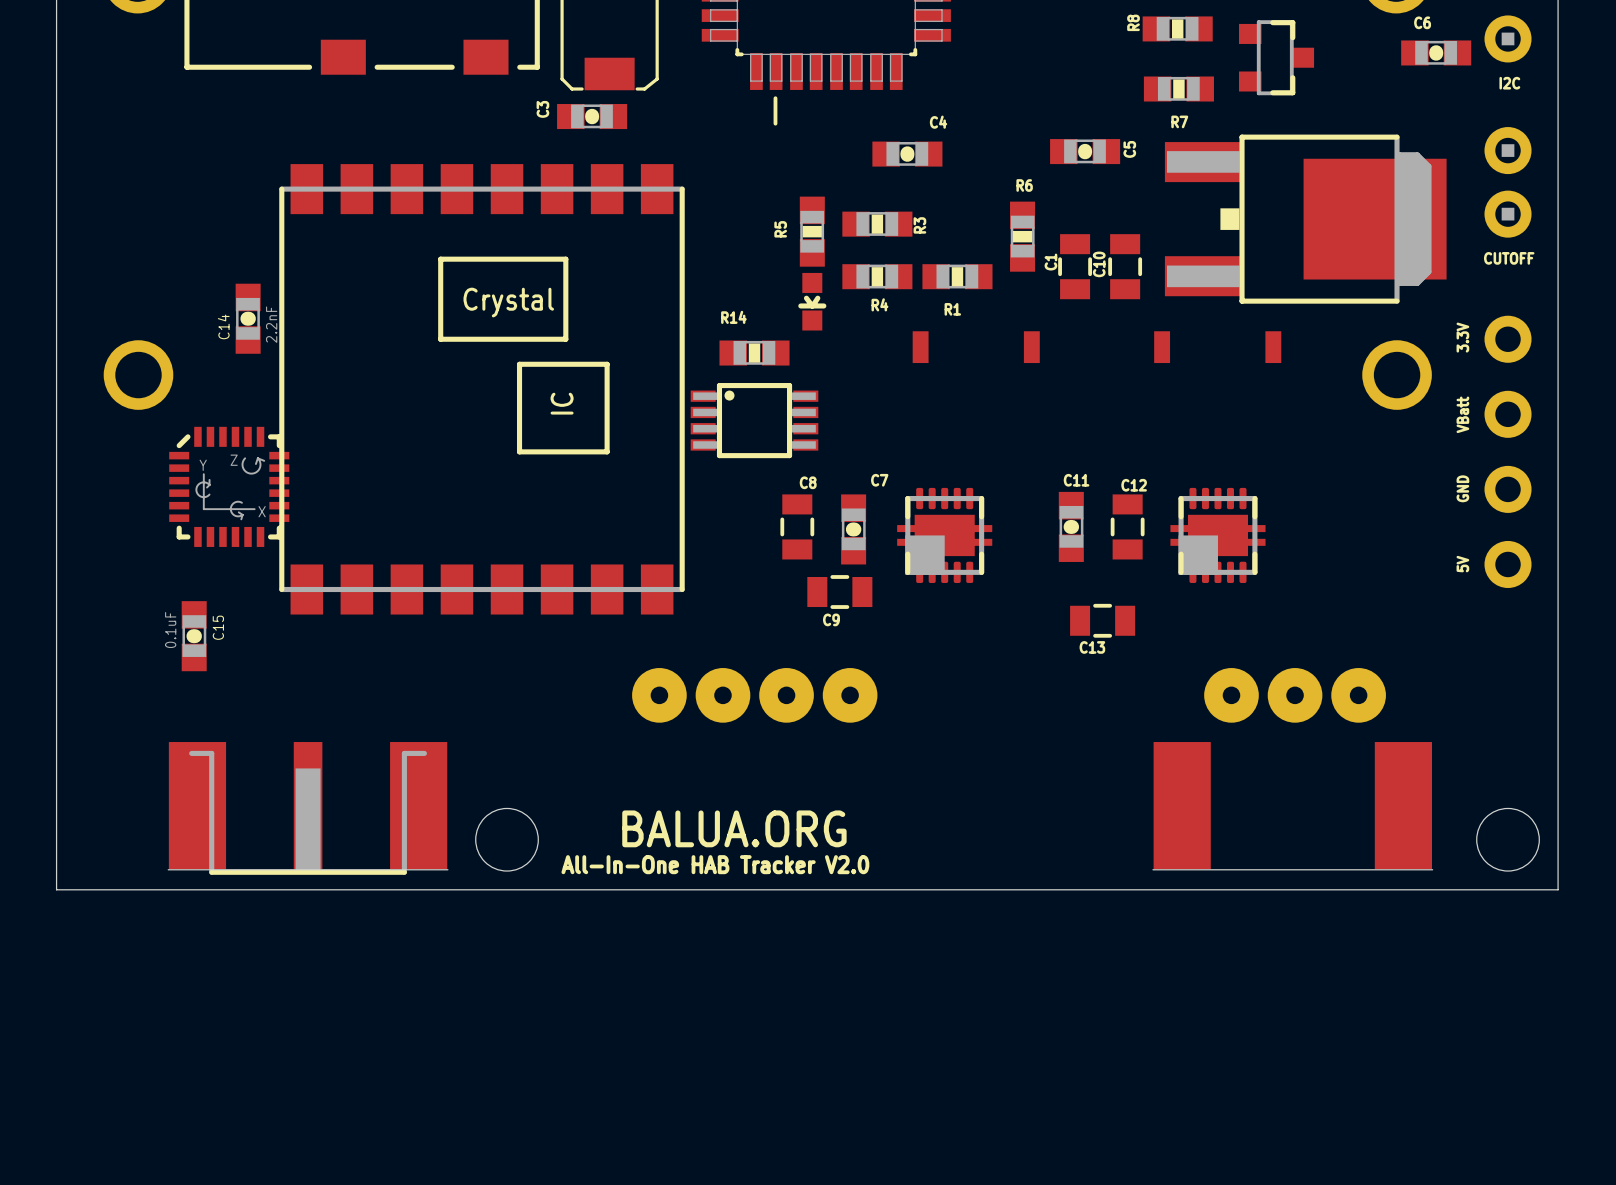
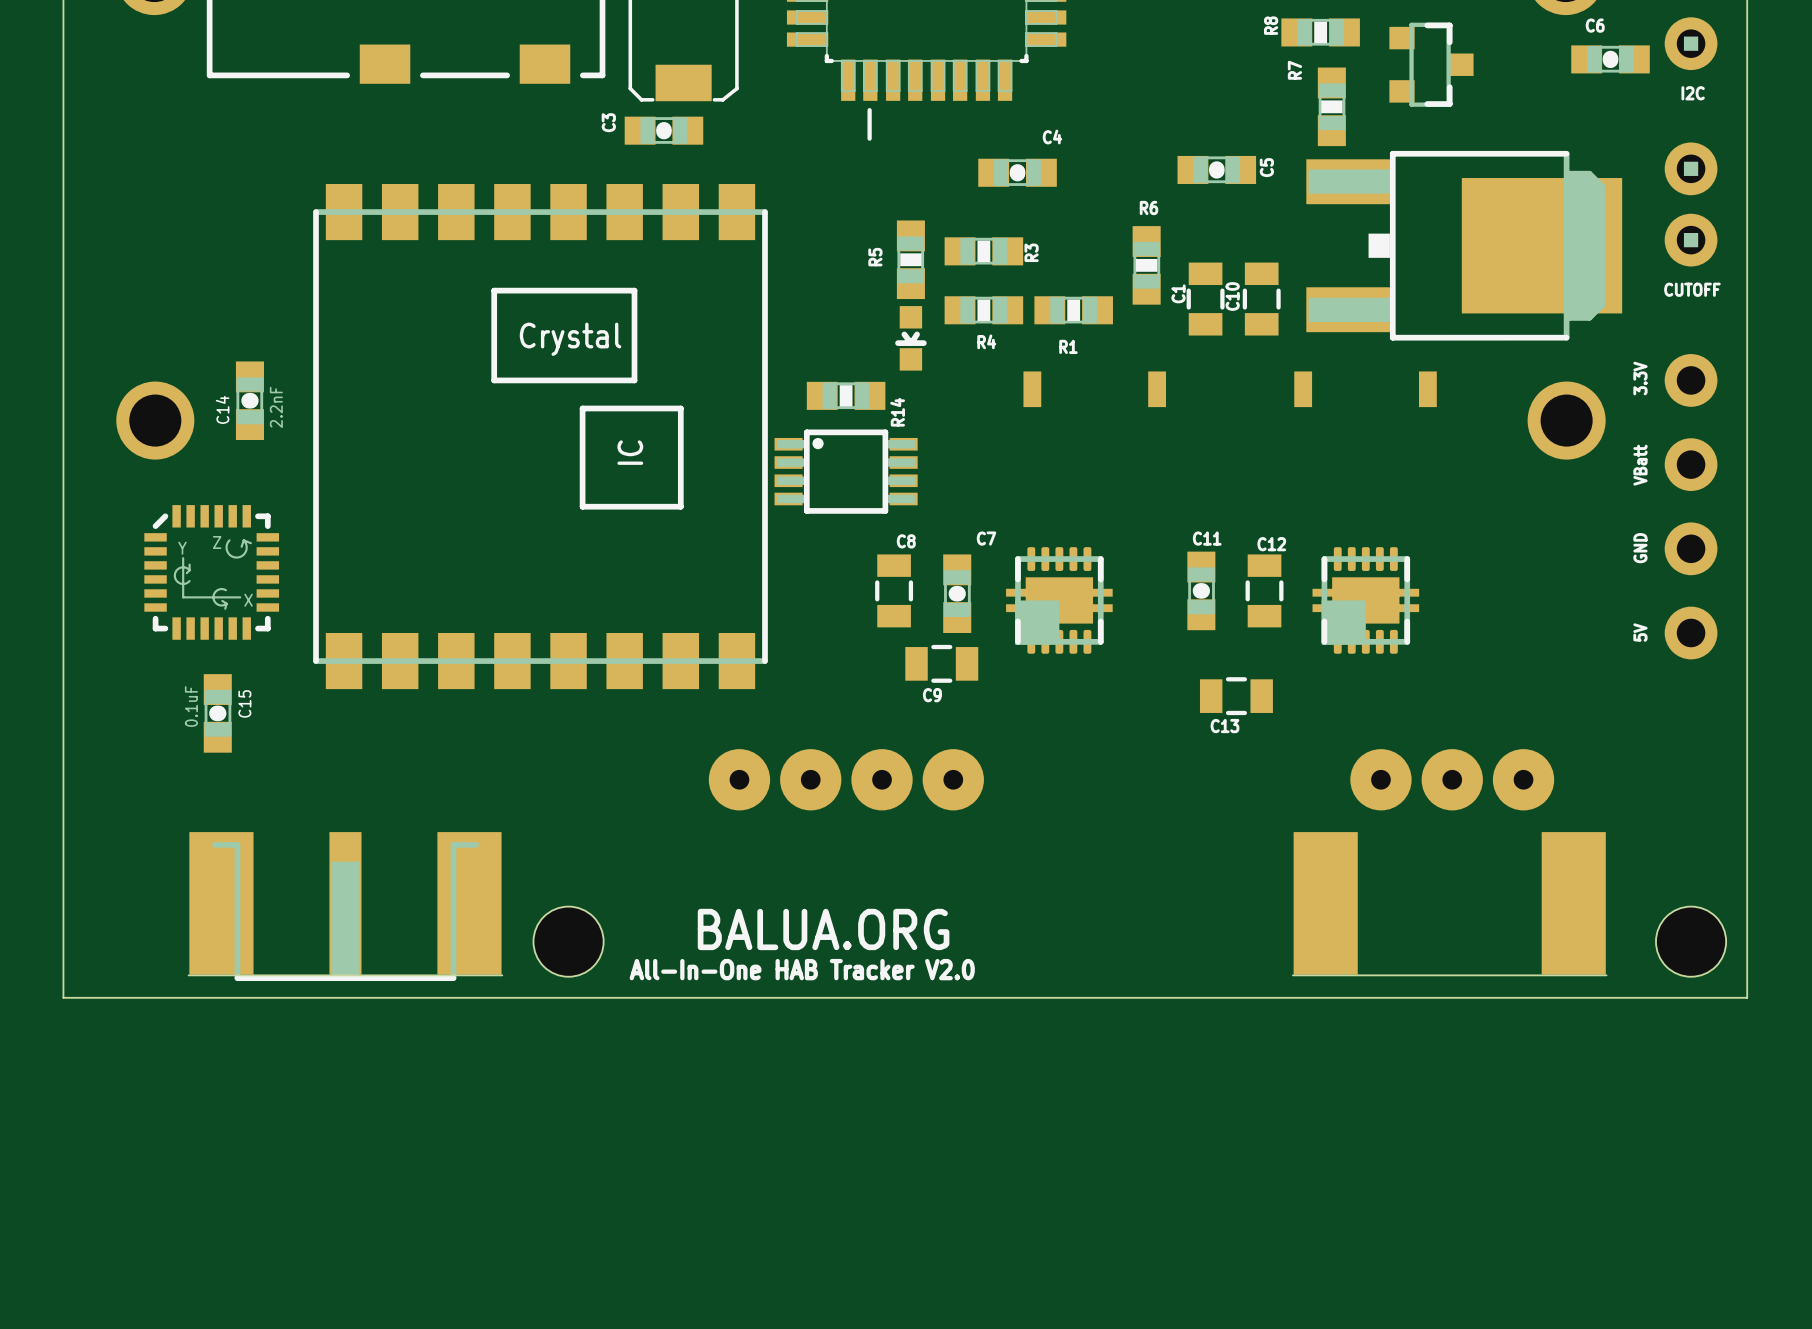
R7 rotation: 0° (1178, 89) -> 90° clockwise (1331, 106)
R14 name rotation: 0° (733, 317) -> 90° counterclockwise (897, 412)
R14 name position: R14 (733, 317) -> R14 (897, 412)
C14 position: (248, 318) -> (249, 400)
part position: (229, 486) -> (211, 572)

